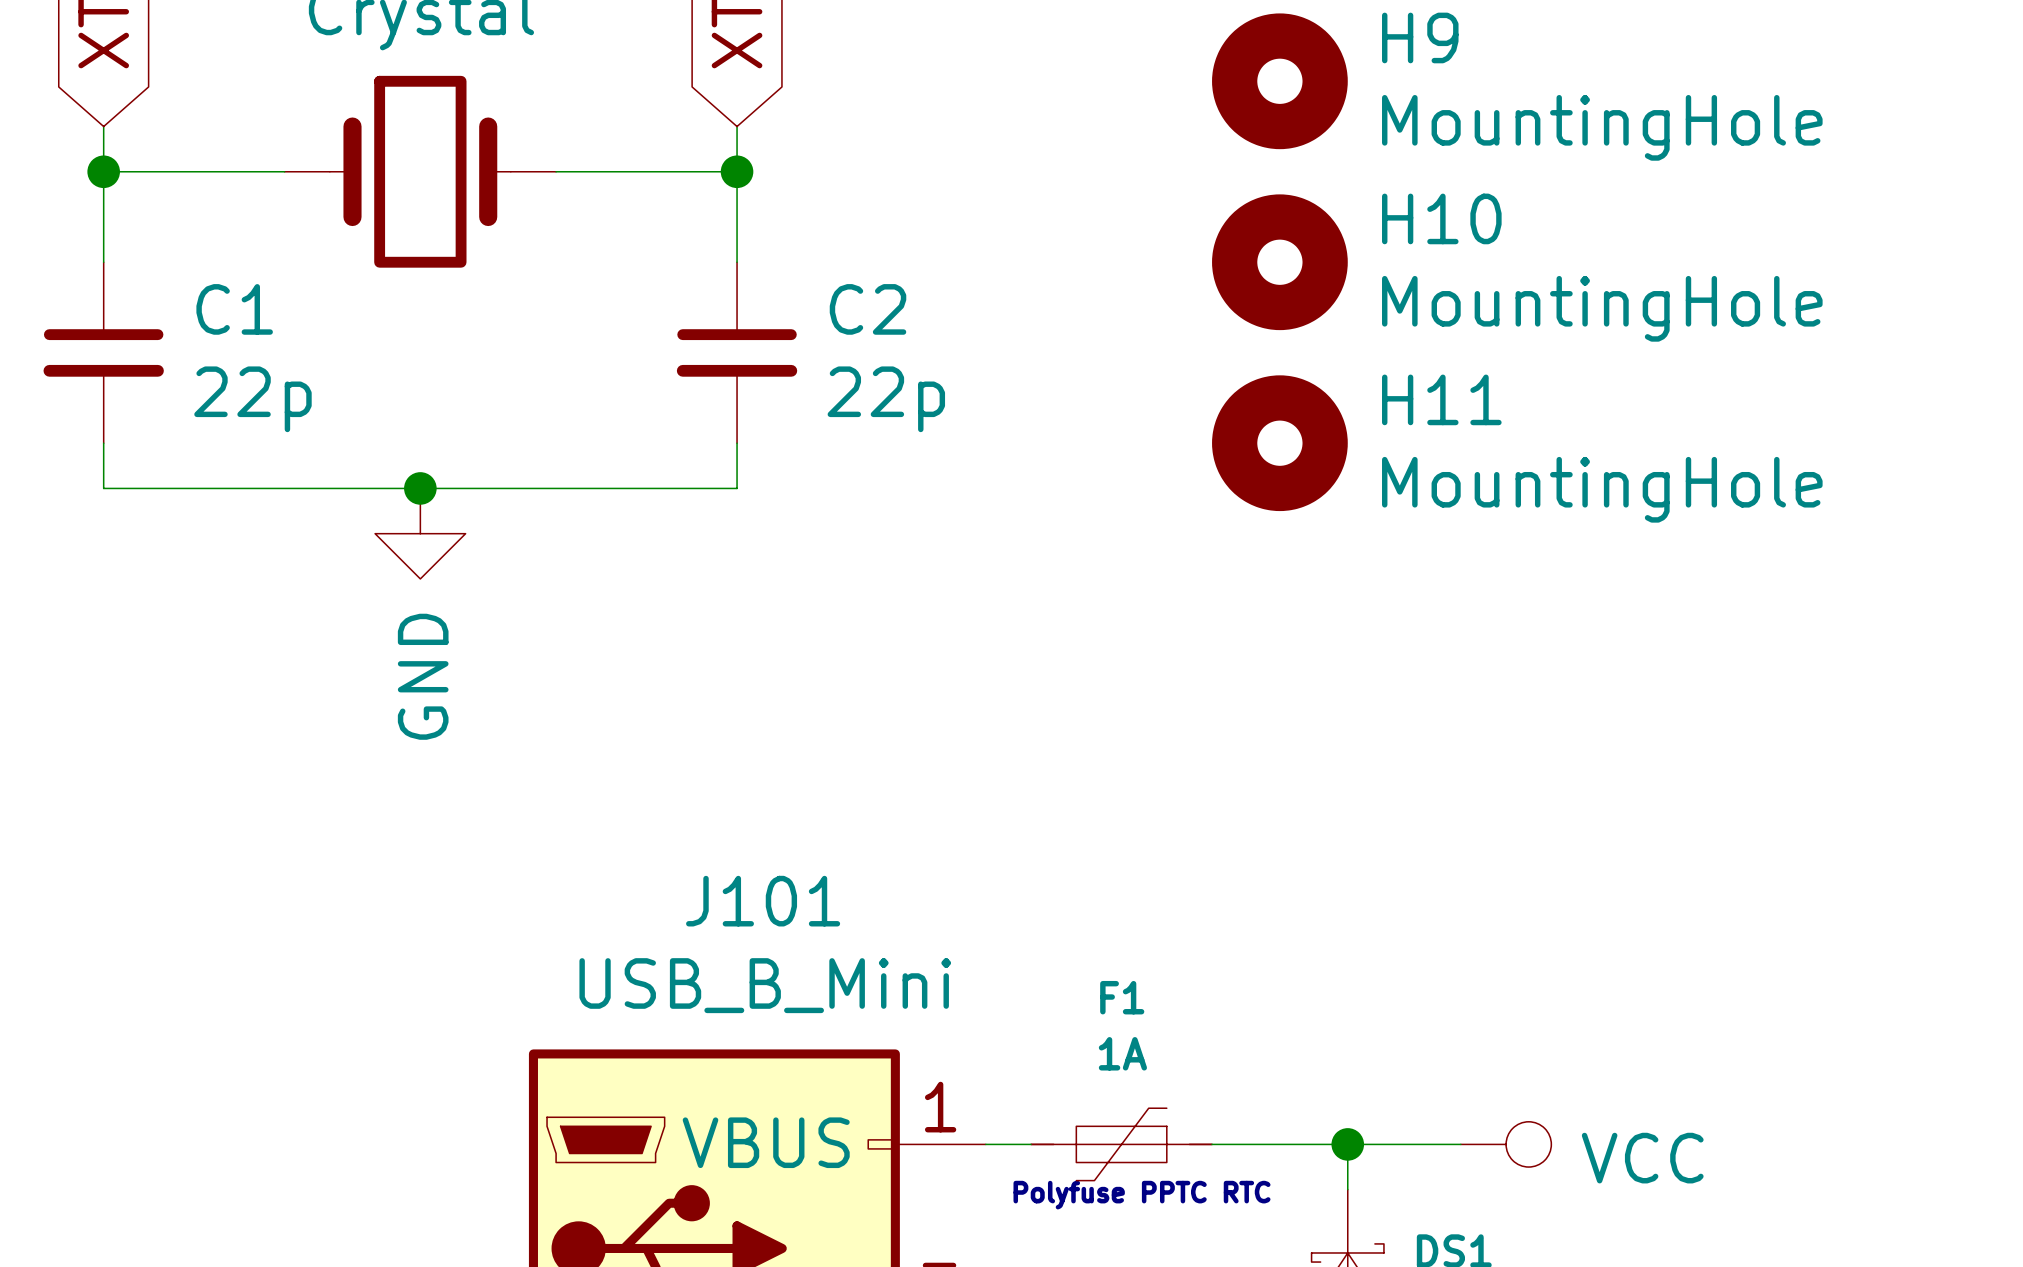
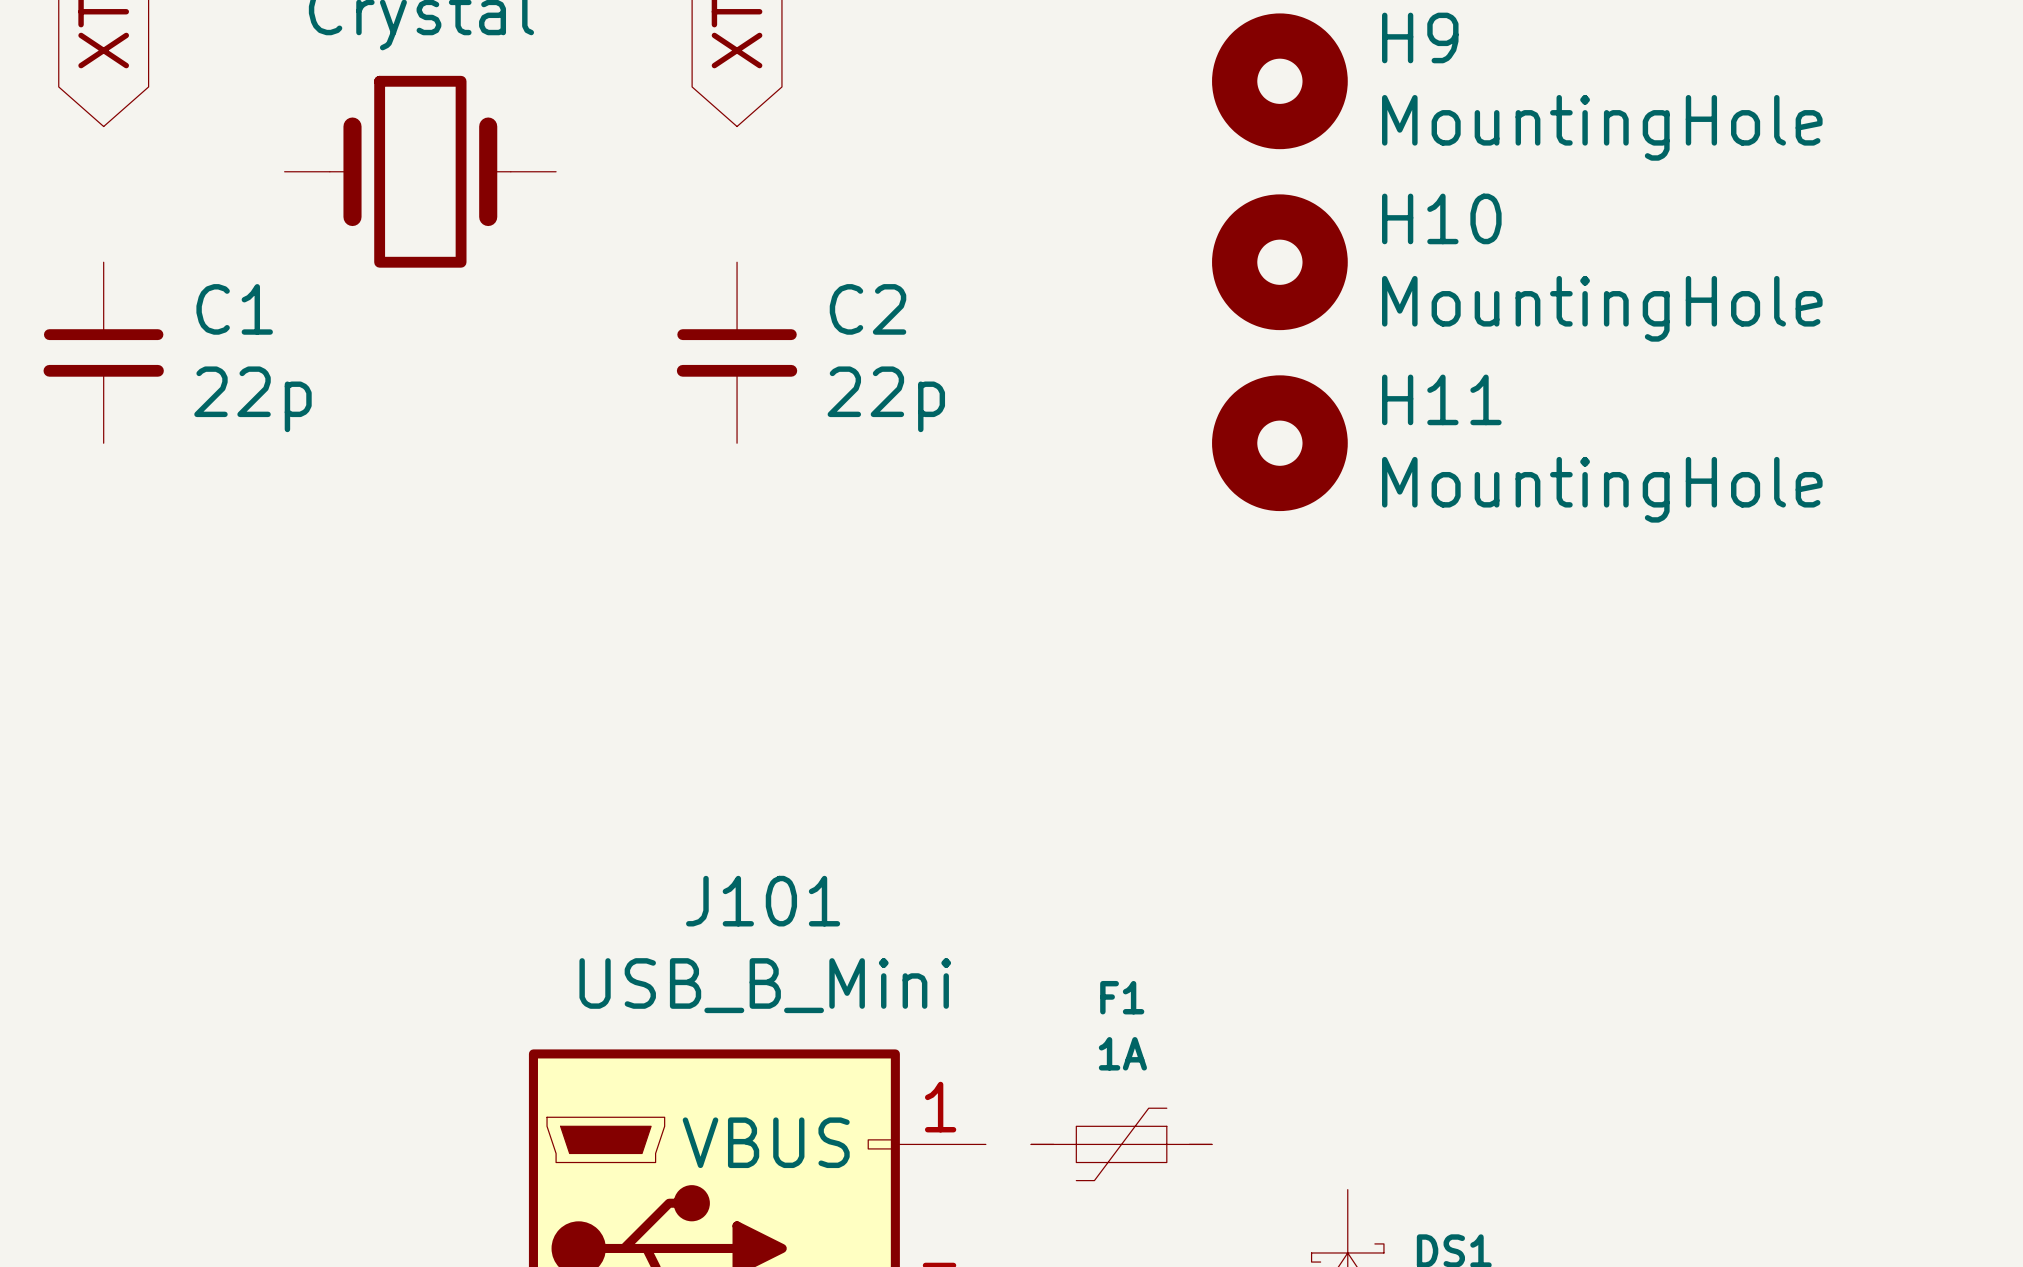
wire: (103, 126) (103, 262) -> none
wire: (737, 126) (737, 262) -> none
wire: (103, 171) (284, 171) -> none
junction: (103, 171) -> none
wire: (556, 171) (737, 171) -> none
junction: (737, 171) -> none
wire: (103, 443) (103, 488) (737, 488) (737, 443) -> none
junction: (420, 488) -> none
power symbol: GND (420, 533) -> none
wire: (985, 1144) (1031, 1144) -> none
wire: (1212, 1144) (1460, 1144) -> none
wire: (1347, 1144) (1347, 1189) -> none
junction: (1347, 1144) -> none
power symbol: VCC (1506, 1144) -> none
text: Polyfuse PPTC RTC (1141, 1195) -> none

